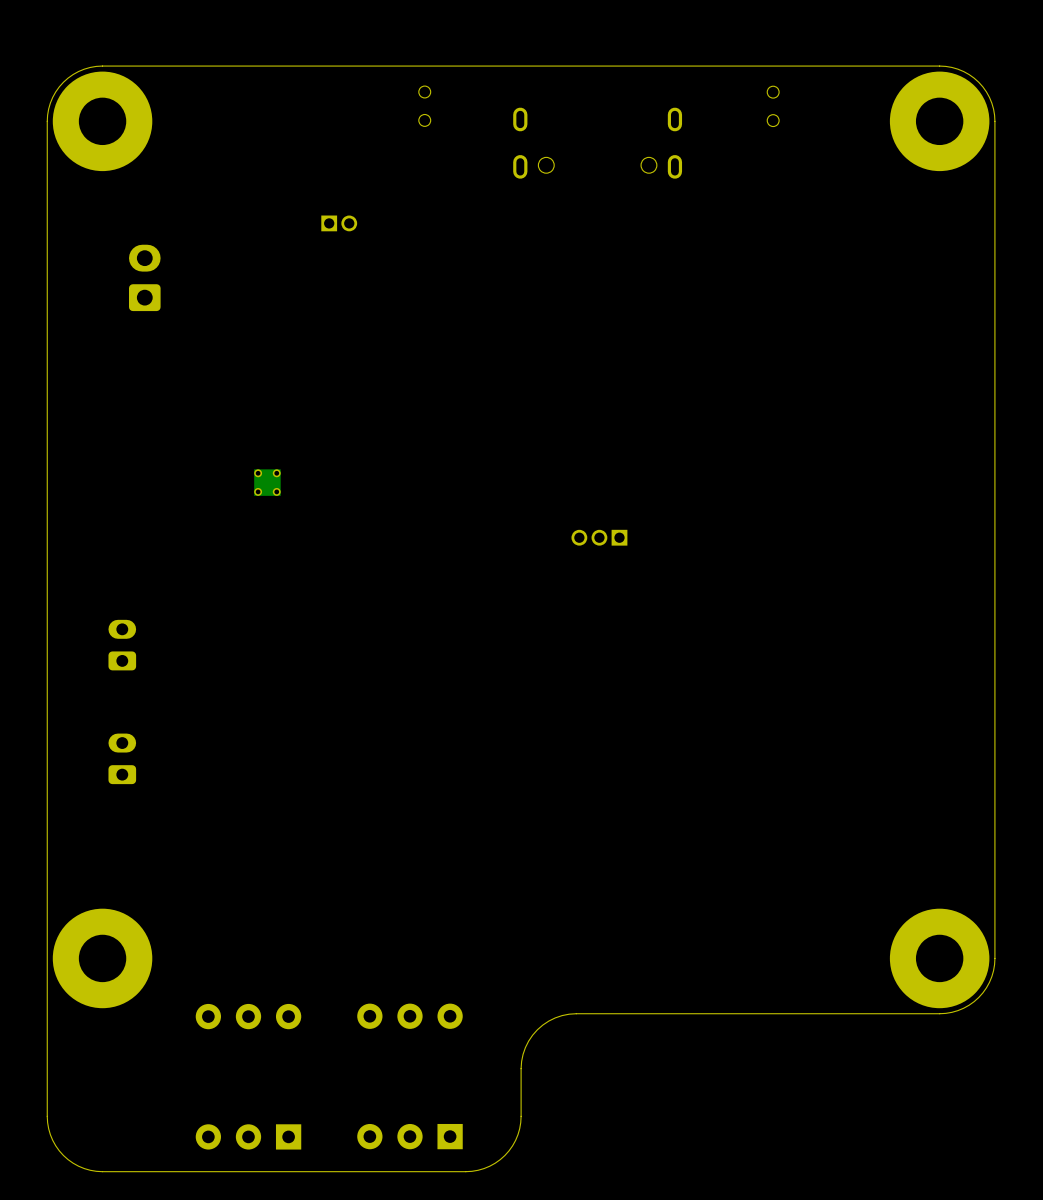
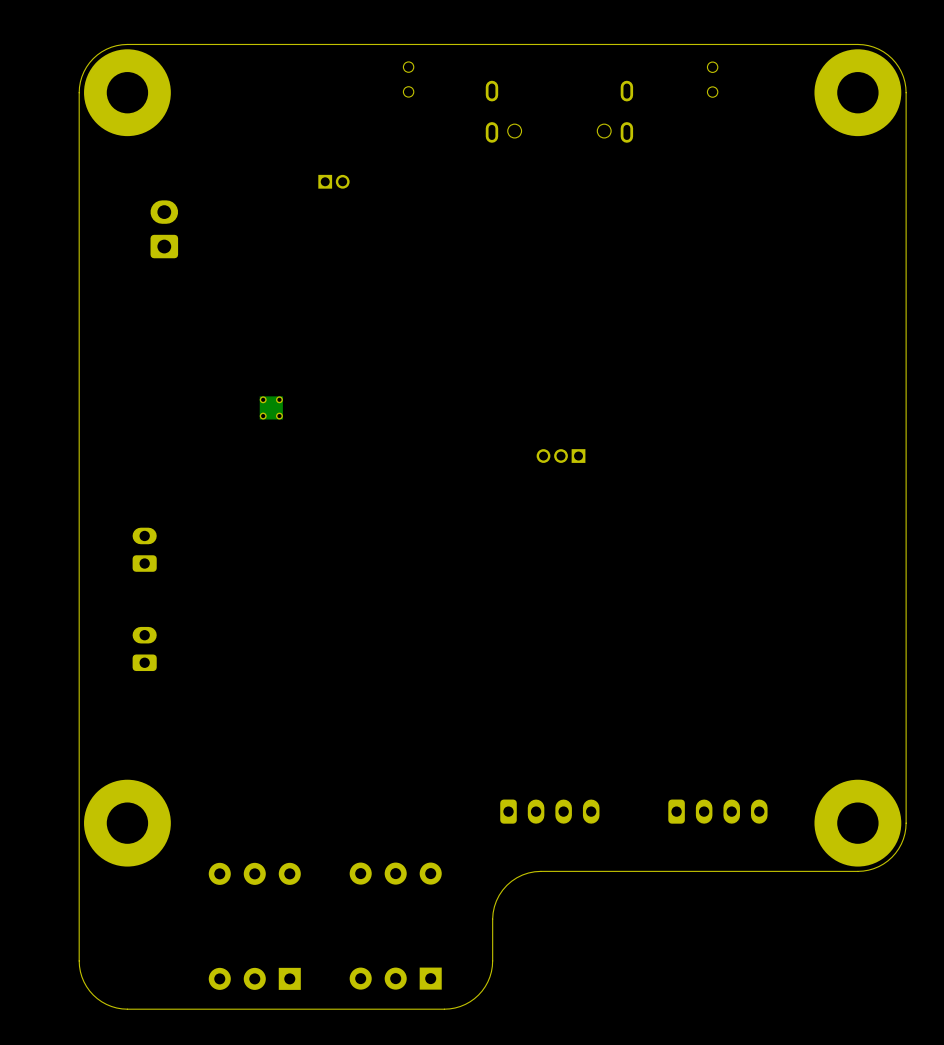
part: none -> (549, 811)
part: none -> (717, 811)

